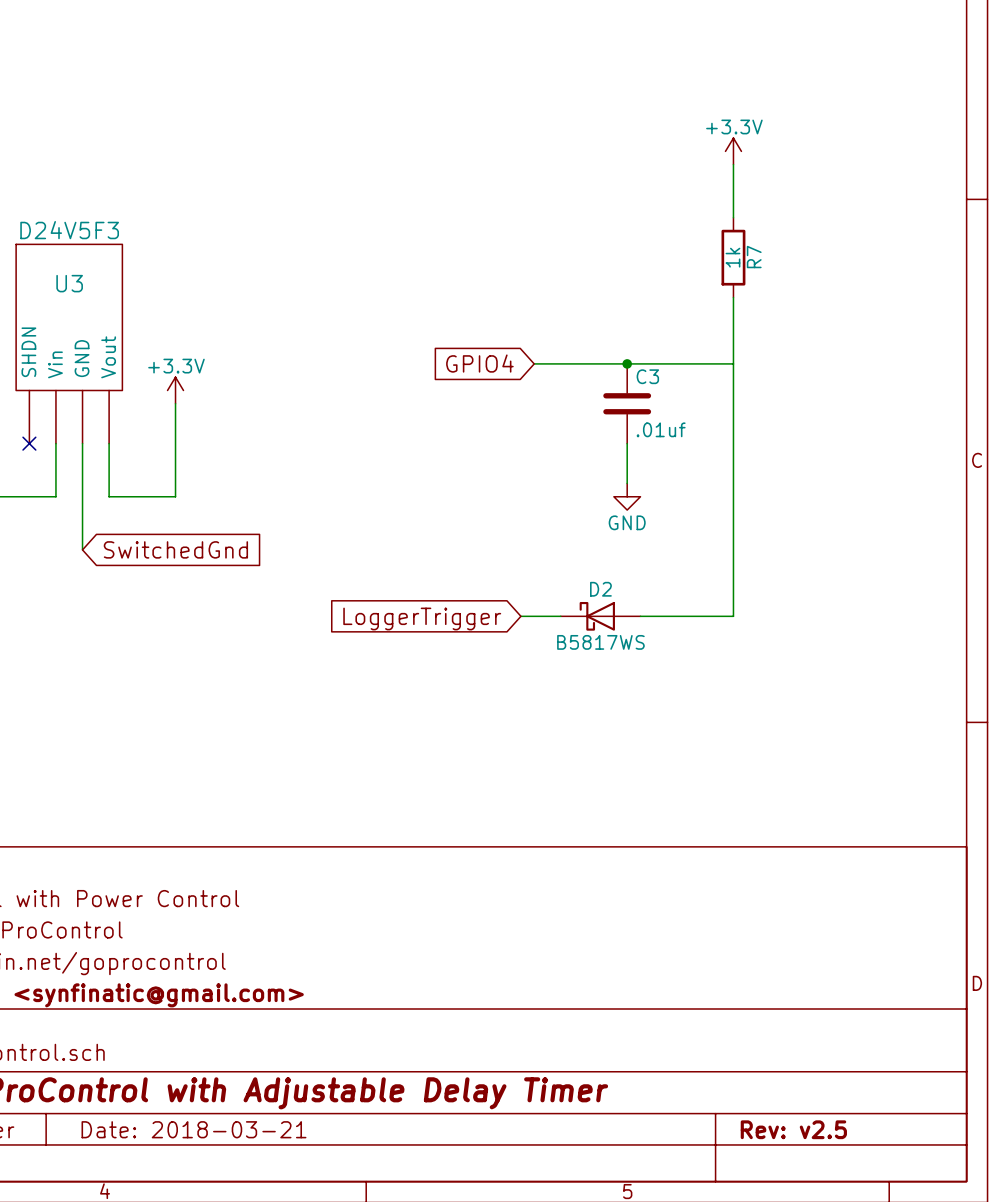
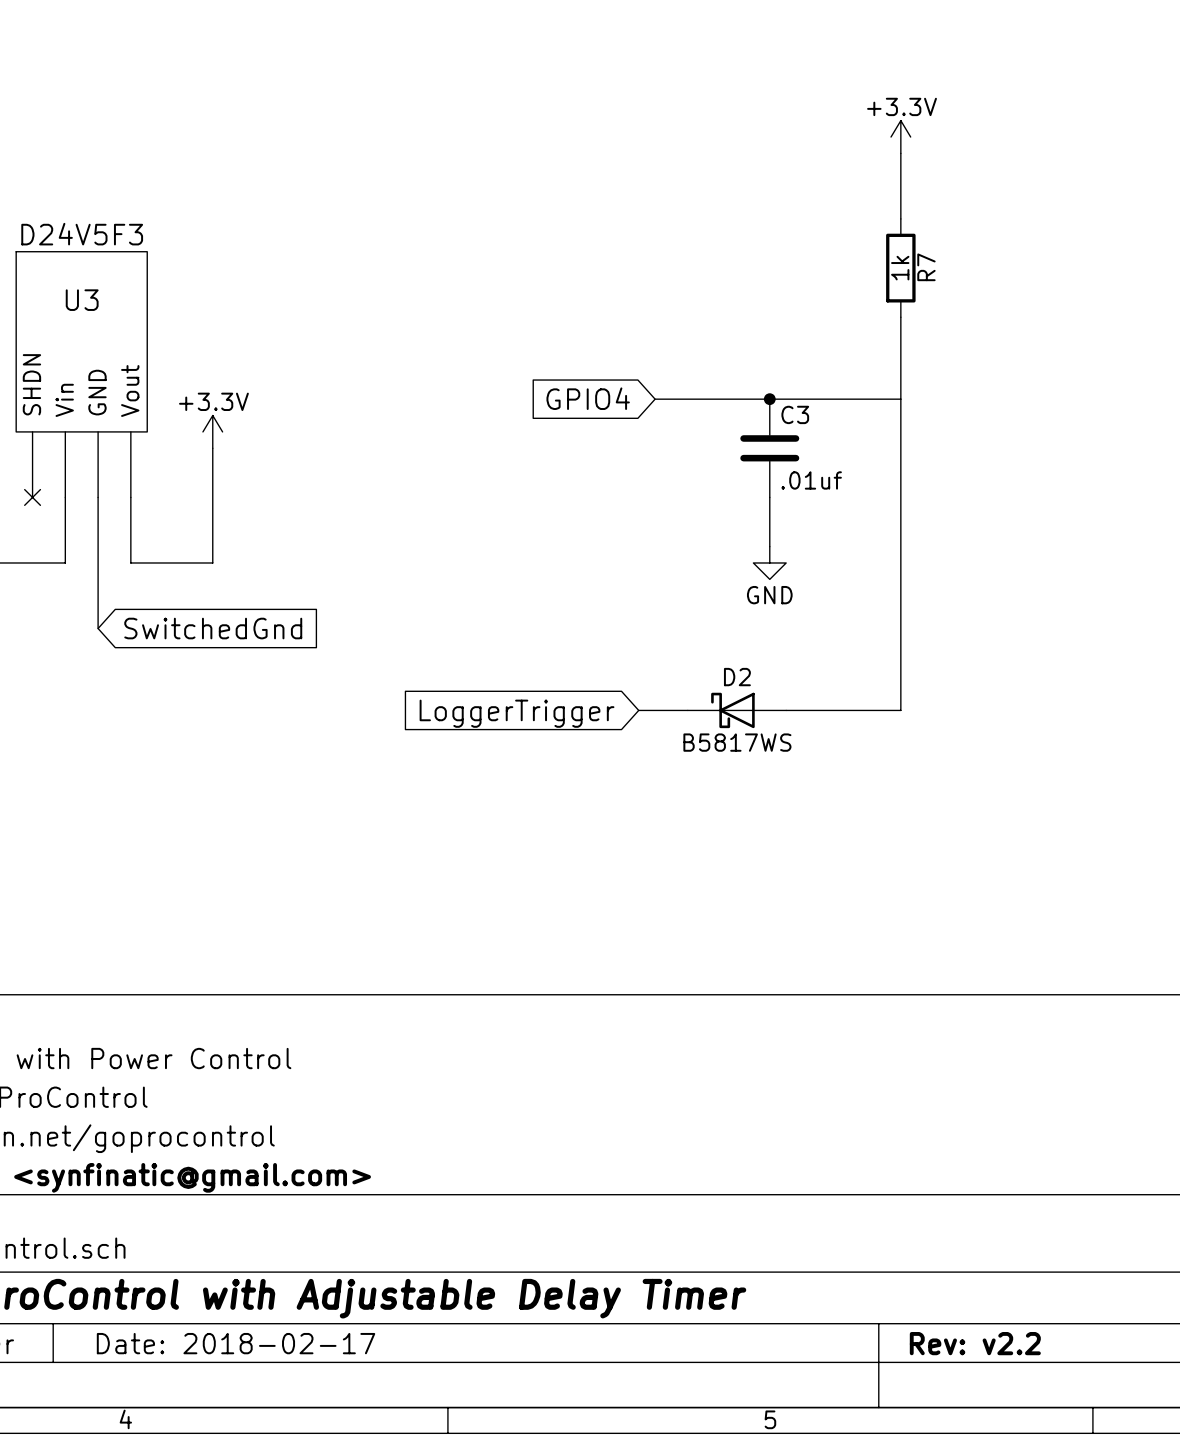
title block: Date: 2018-03-21 (193, 1129) -> Date: 2018-02-17 (236, 1343)
title block: Rev: v2.5 (793, 1129) -> Rev: v2.2 (975, 1343)

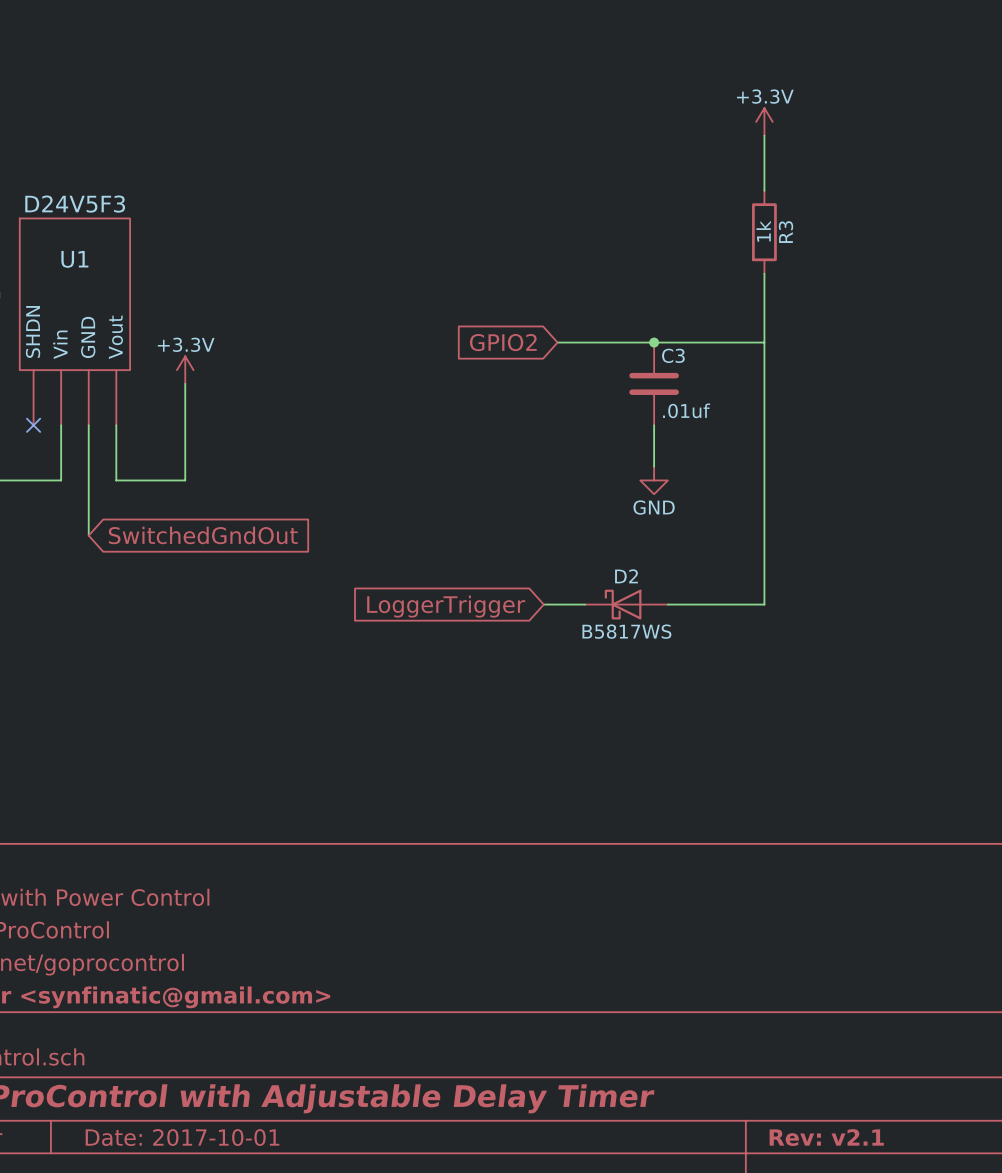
R7 name: R7 (926, 267) -> R3 (785, 232)
U3 name: U3 (82, 300) -> U1 (74, 259)
global label: GPIO4 (588, 398) -> GPIO2 (503, 342)
global label: SwitchedGnd (213, 628) -> SwitchedGndOut (203, 535)
title block: Date: 2018-02-17 (236, 1343) -> Date: 2017-10-01 (182, 1137)
title block: Rev: v2.2 (975, 1343) -> Rev: v2.1 (826, 1137)

